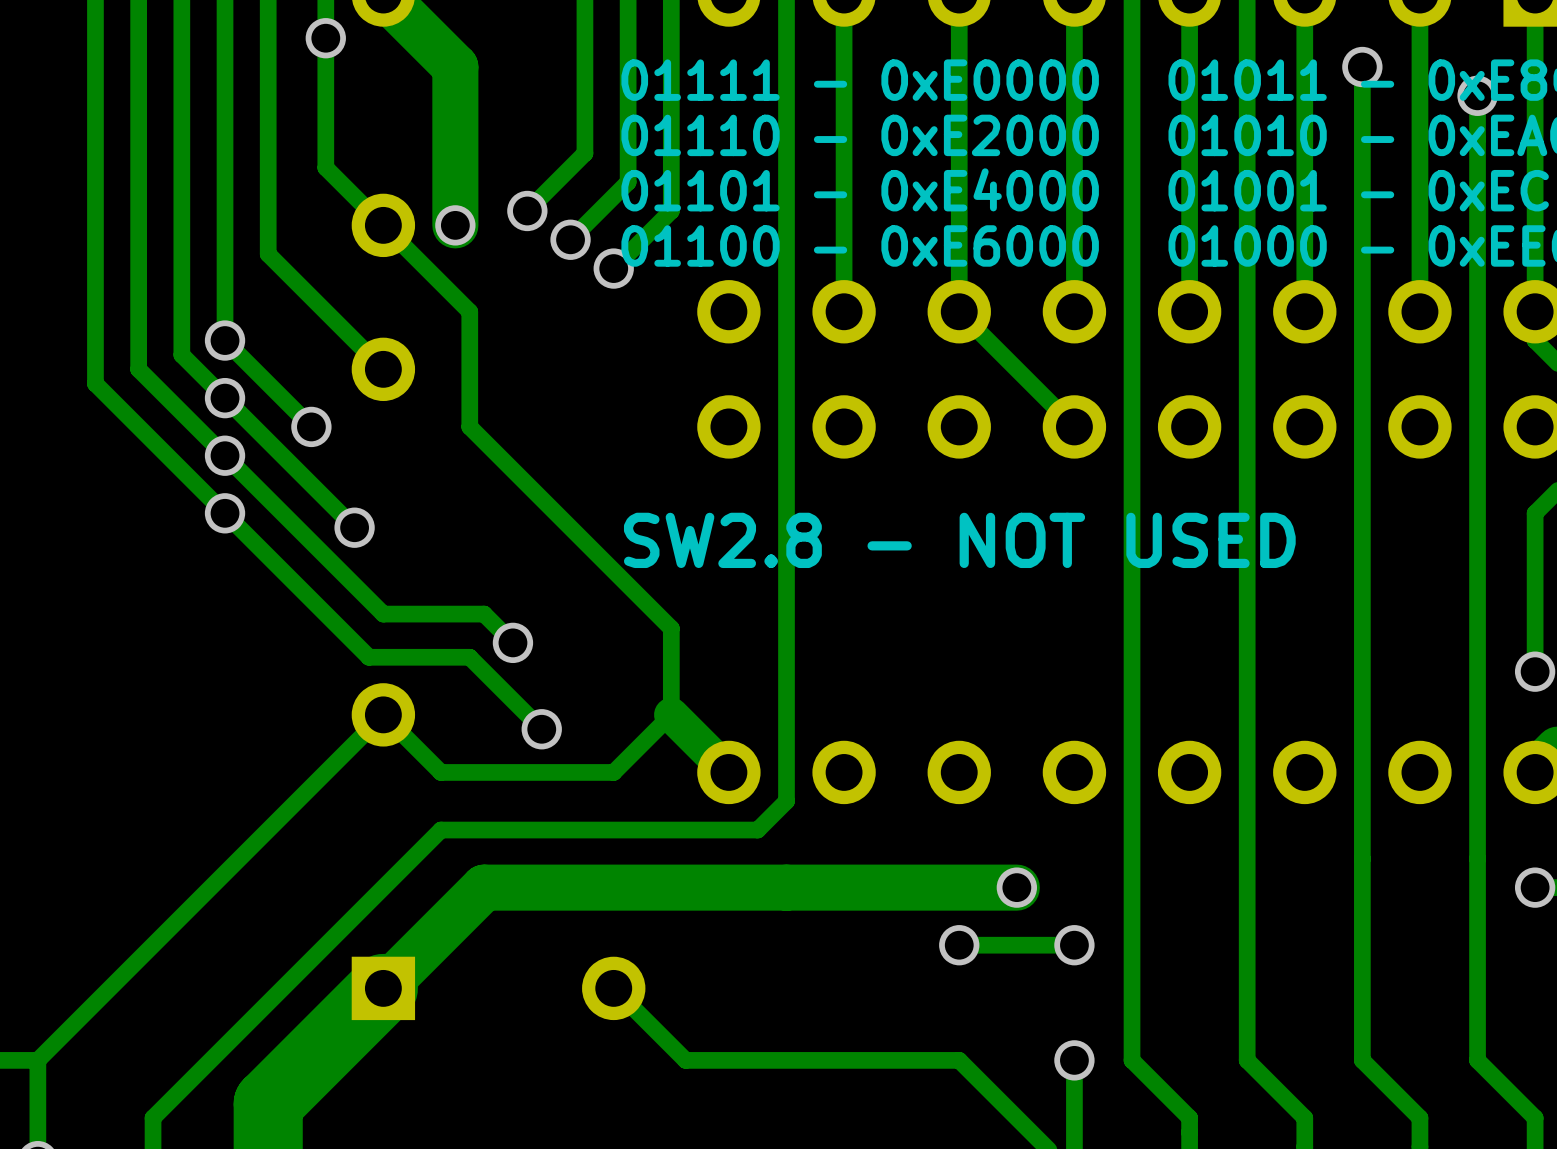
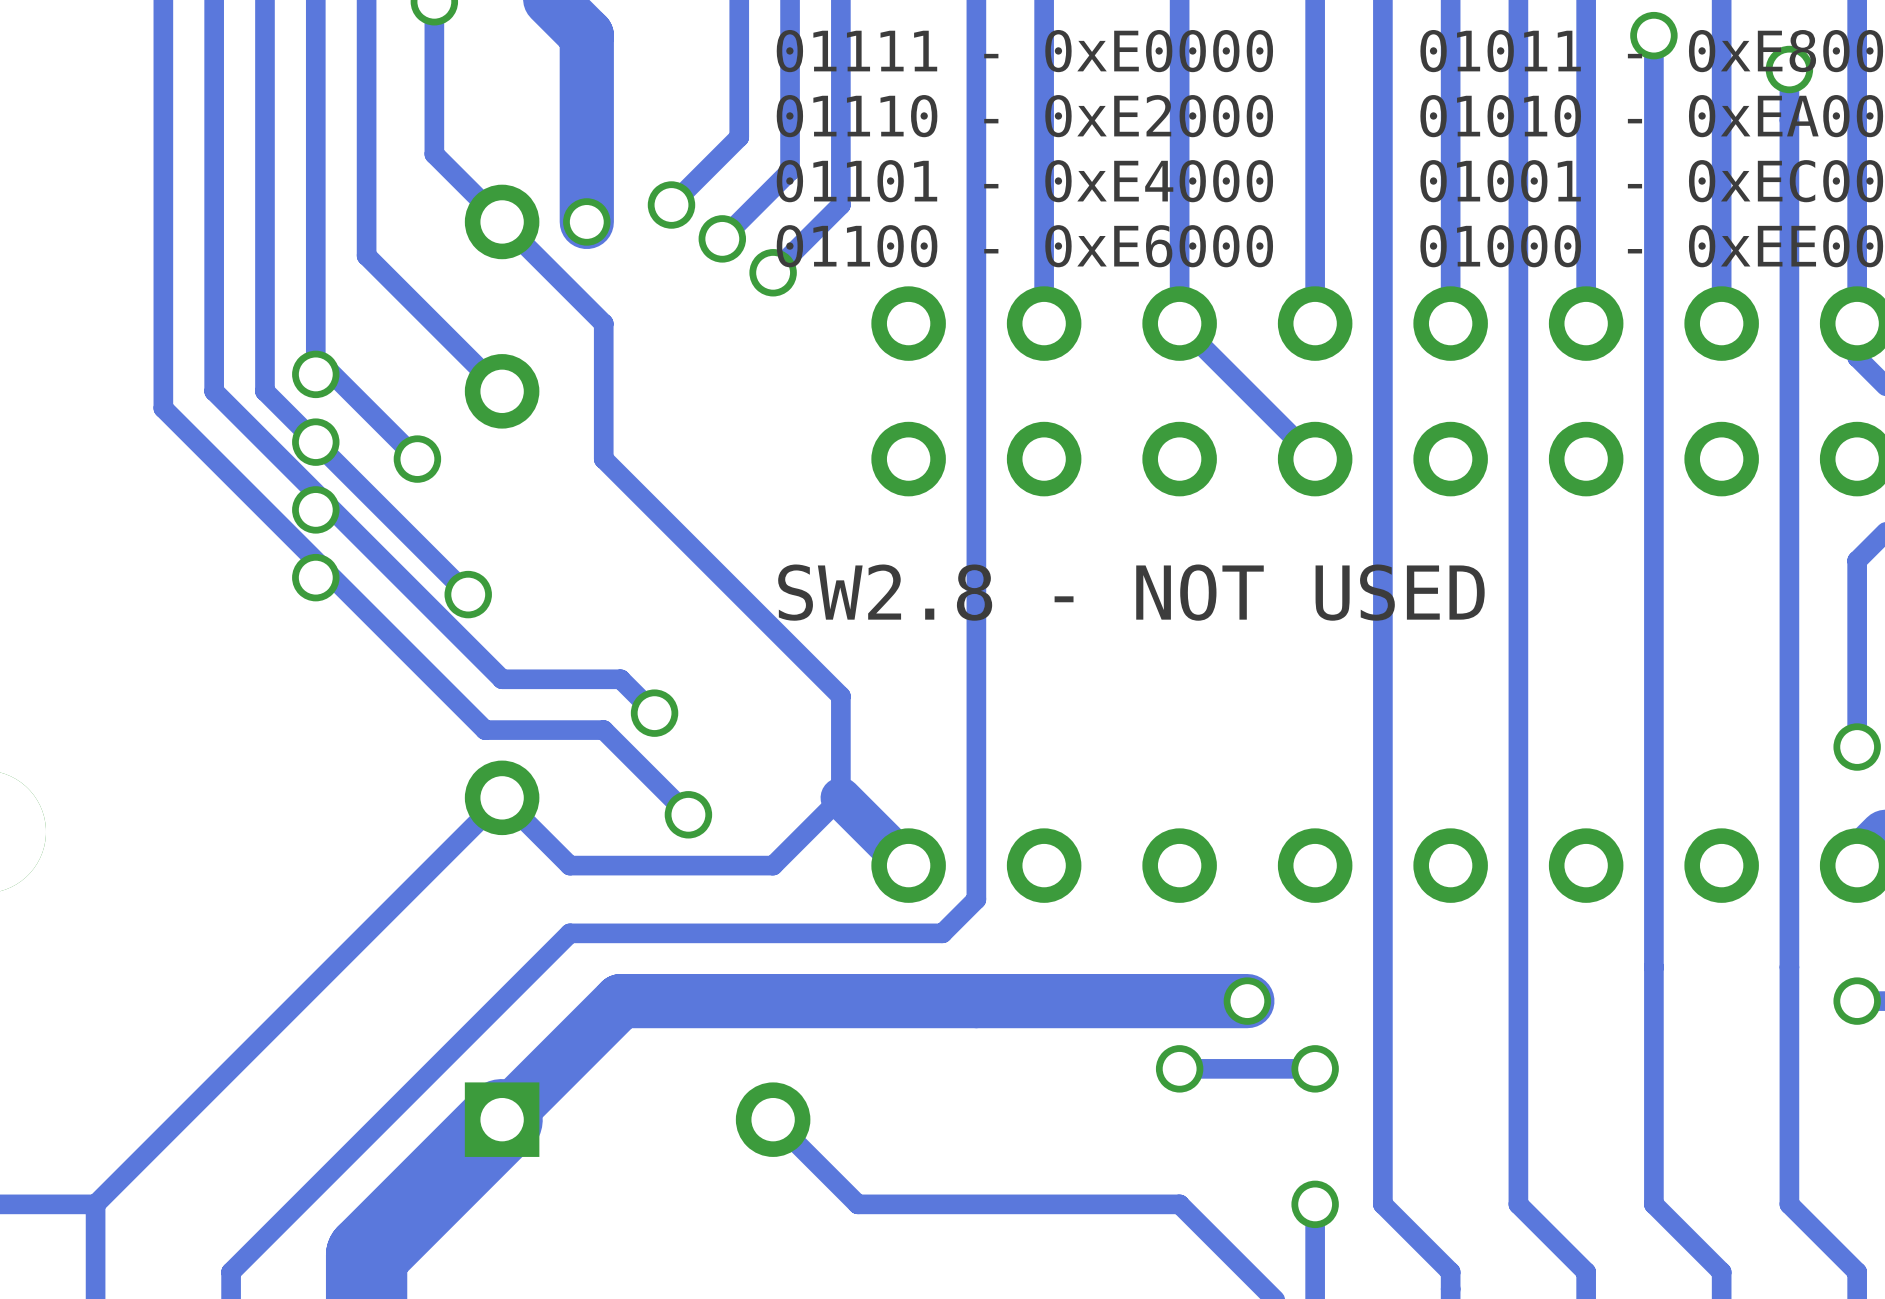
via position: (225, 340) -> (315, 374)
track: (181, 354) (354, 527) -> (264, 374) (264, 391) (468, 594)
via position: (225, 398) -> (315, 442)
via position: (225, 455) -> (315, 509)
via position: (225, 513) -> (315, 577)
via position: (354, 527) -> (468, 594)

